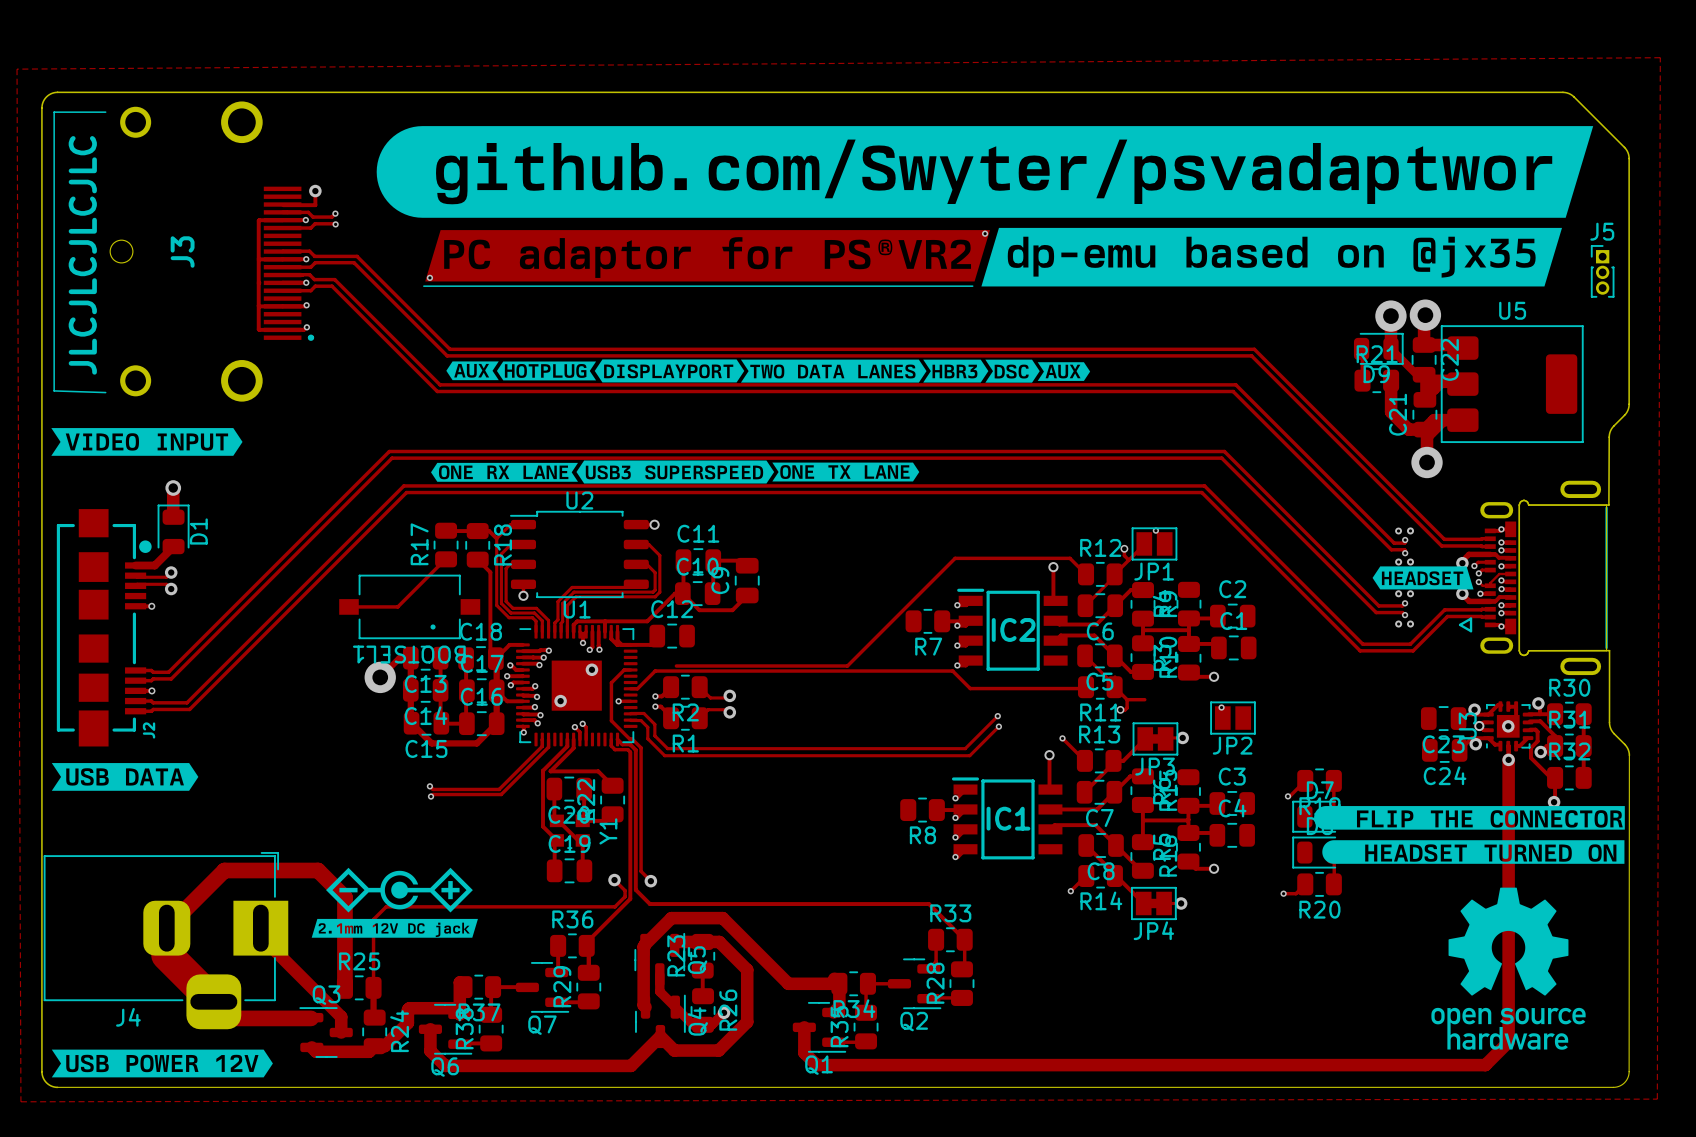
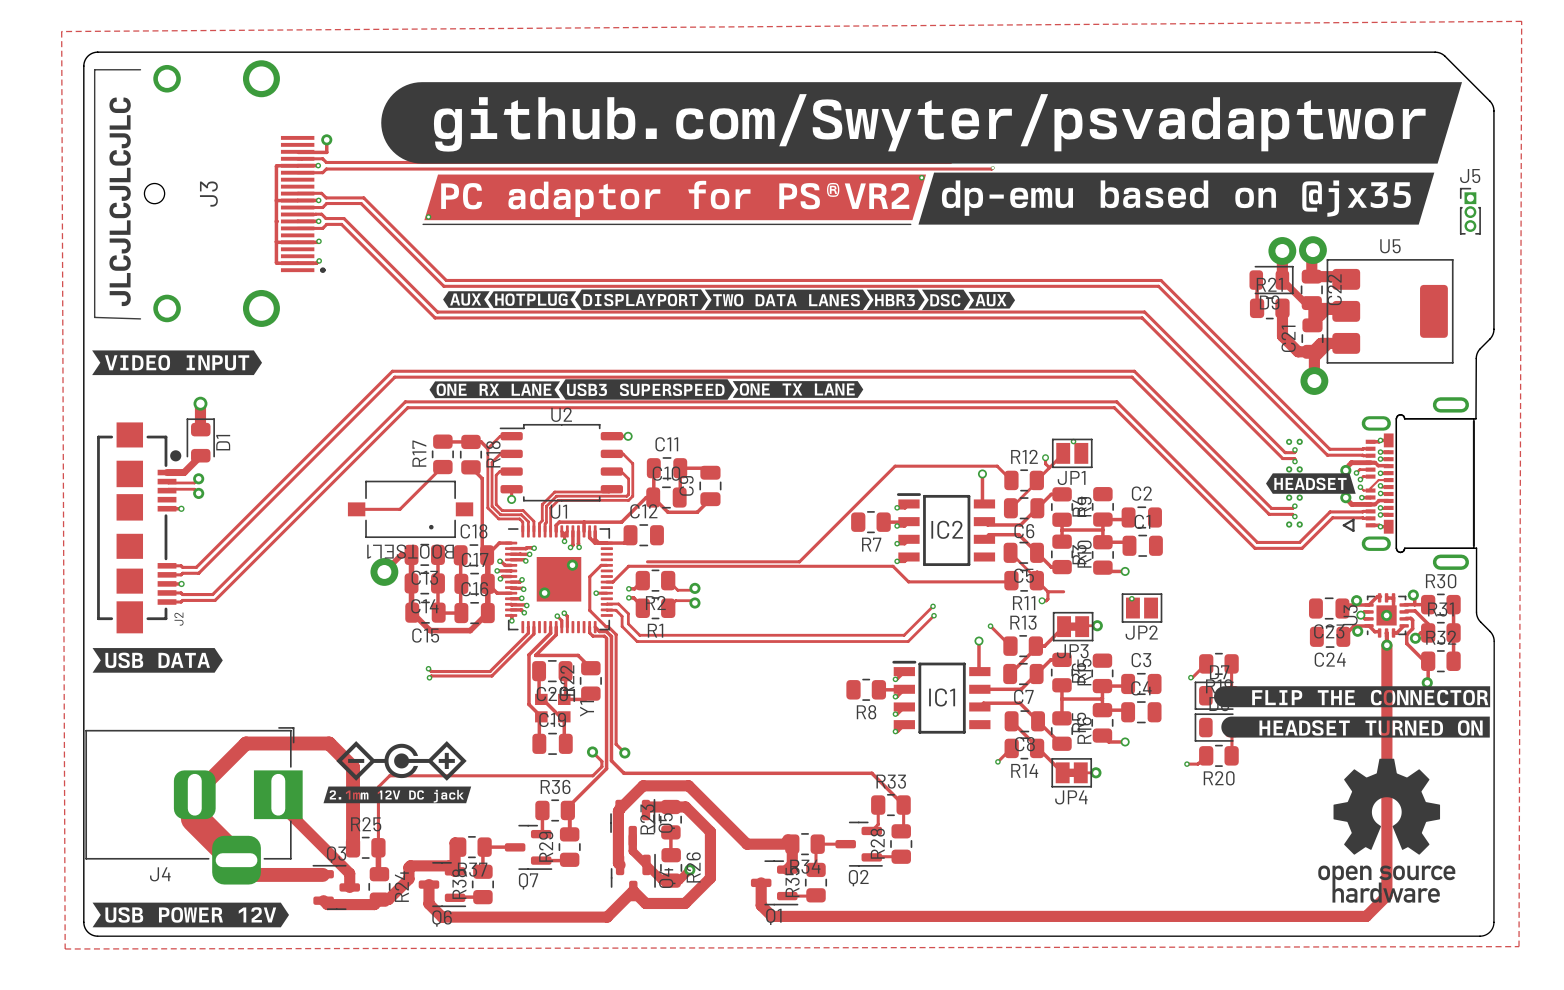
track: (308, 212) (313, 217) (331, 217) (335, 213) -> (320, 158) (326, 162) (950, 162) (955, 156)
via: (335, 213) -> none
via: none -> (992, 167)
track: (315, 223) (335, 224) -> (326, 169) (992, 167)
via: (335, 224) -> none

